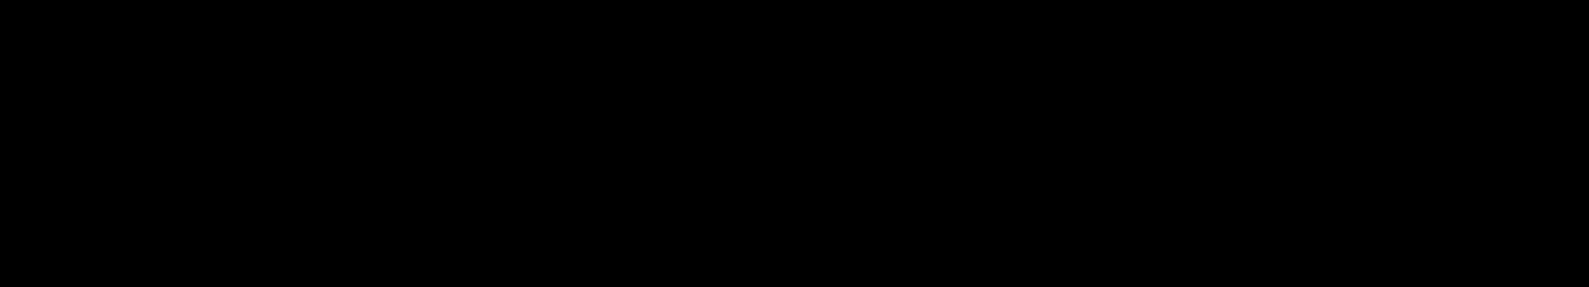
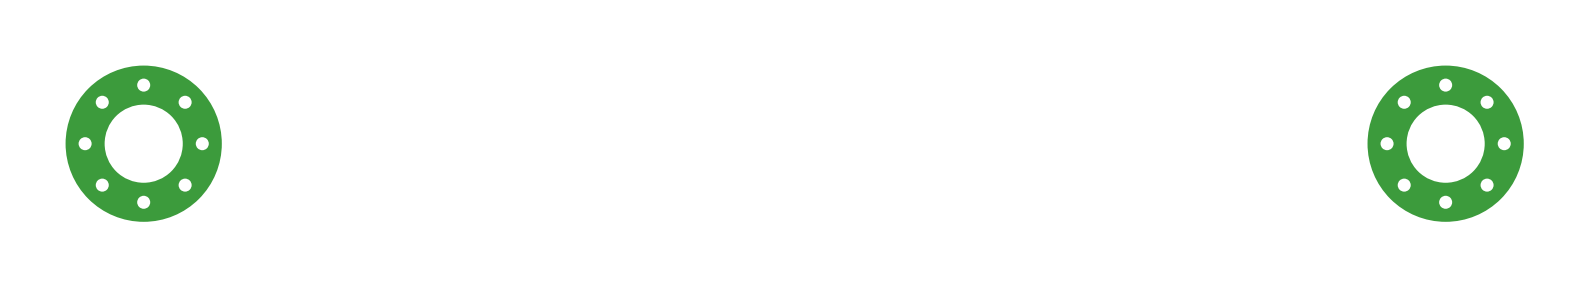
part: none -> (143, 143)
part: none -> (1445, 143)

